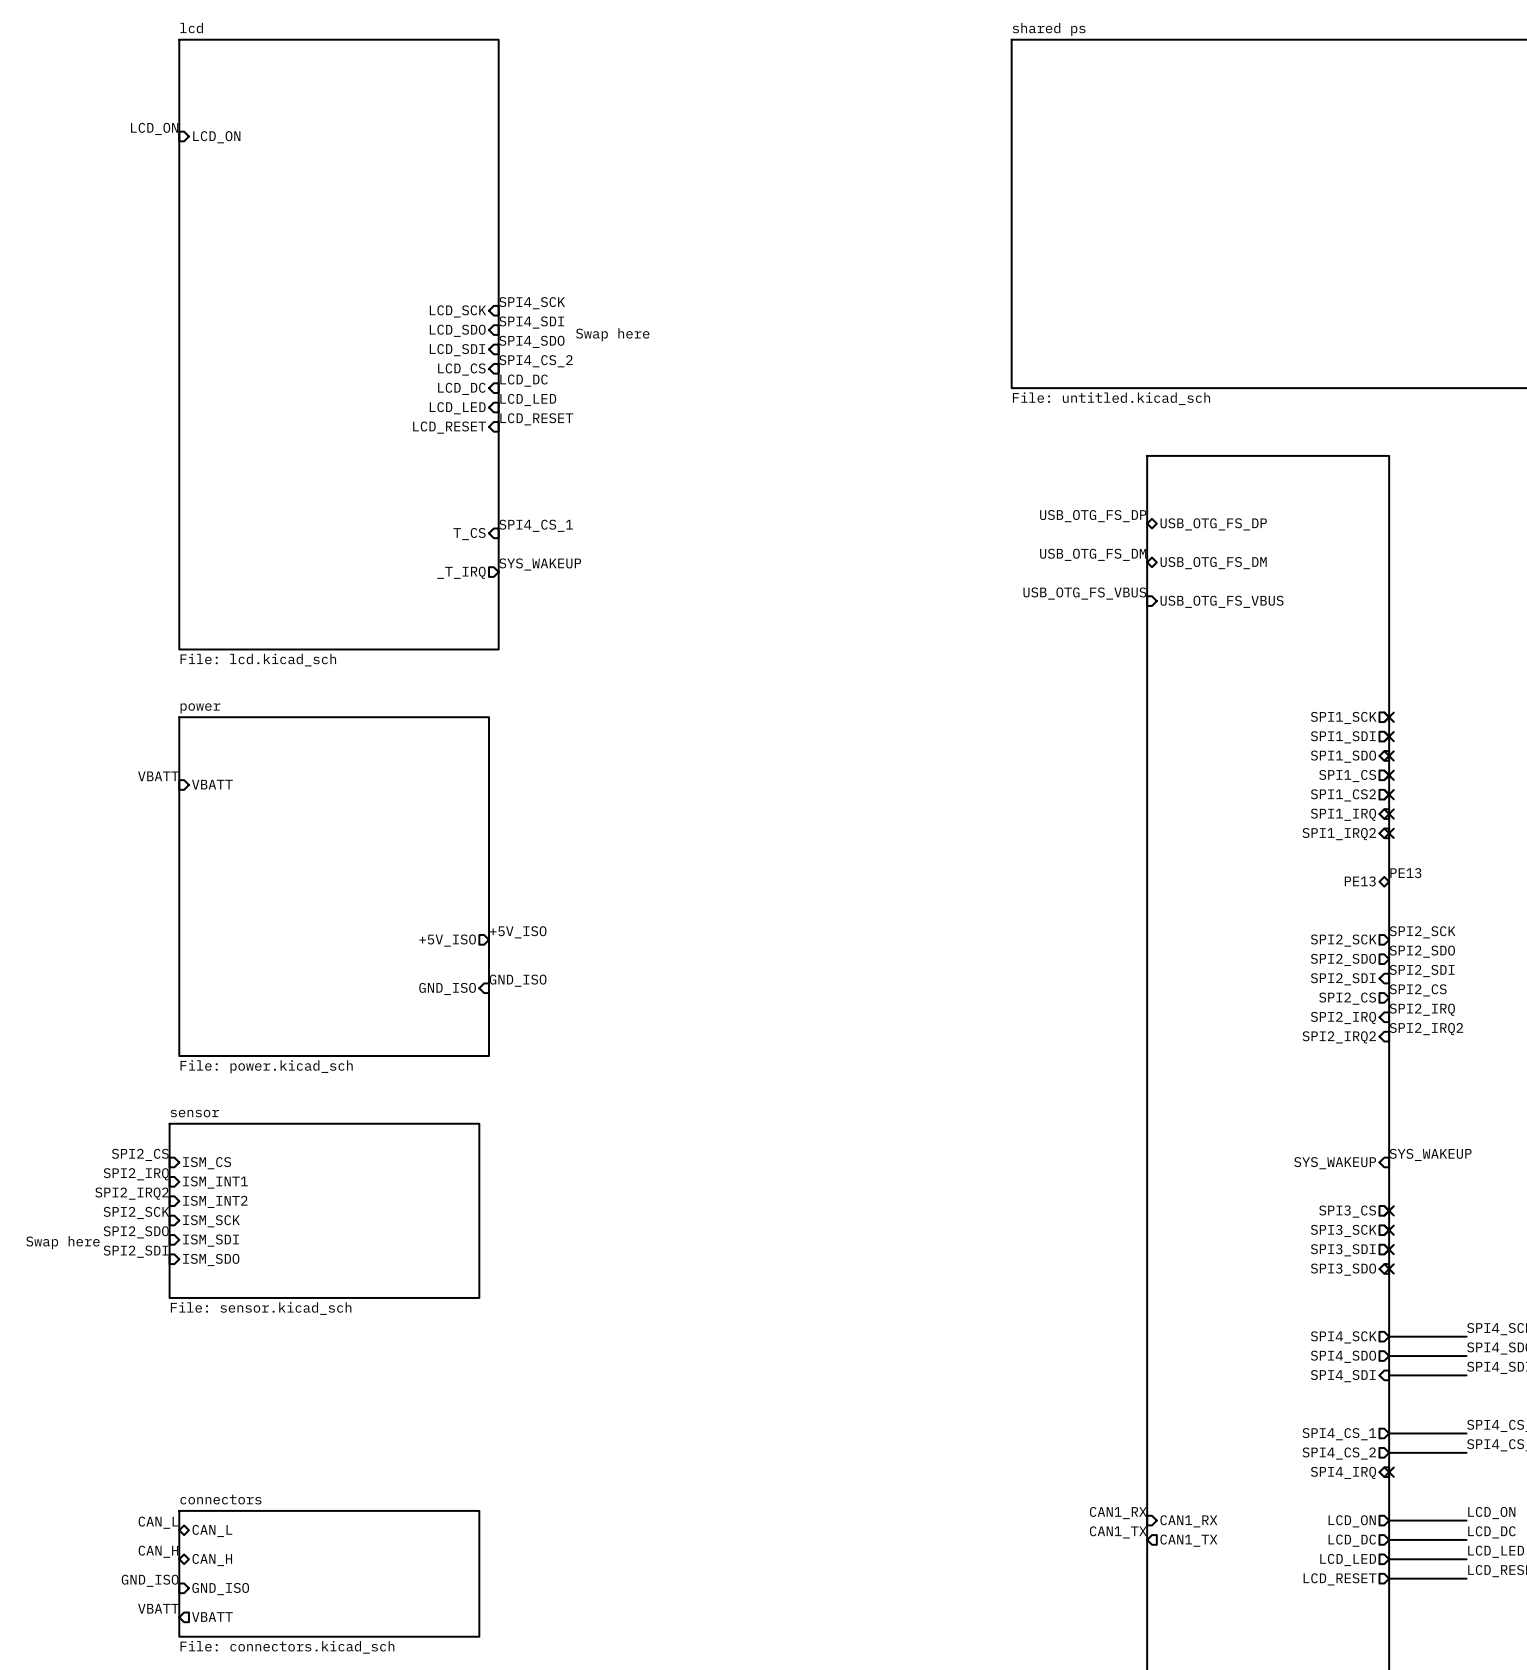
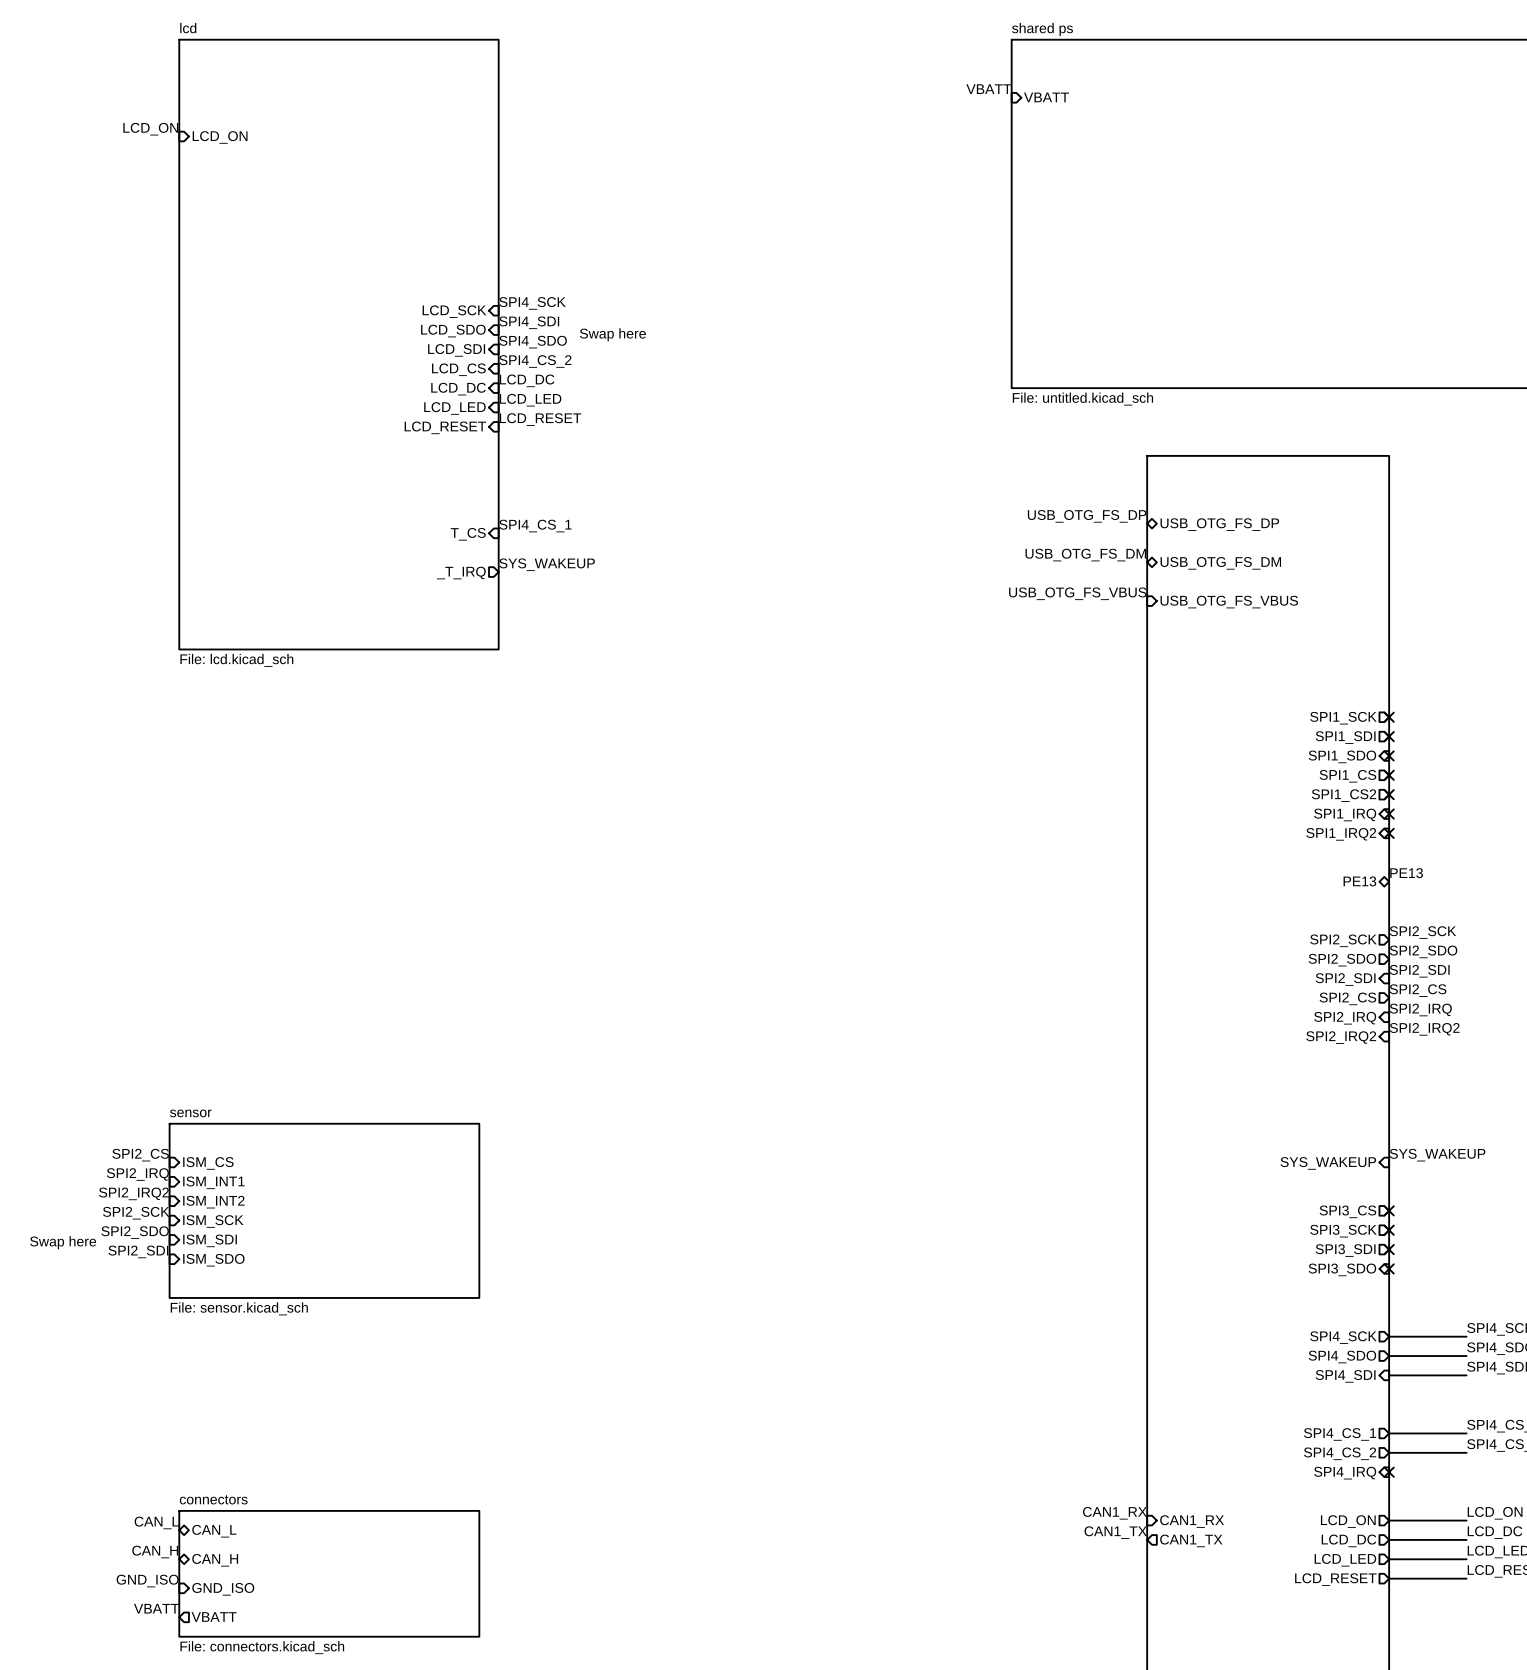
label: none -> VBATT (988, 89)
sheet pin: none -> VBATT (1046, 97)
label: VBATT (158, 776) -> none
sheet pin: VBATT (212, 784) -> none
sheet power: File: power.kicad_sch (334, 886) -> none
label: +5V_ISO (518, 932) -> none
sheet pin: +5V_ISO (447, 940) -> none
label: GND_ISO (518, 980) -> none
sheet pin: GND_ISO (447, 988) -> none

